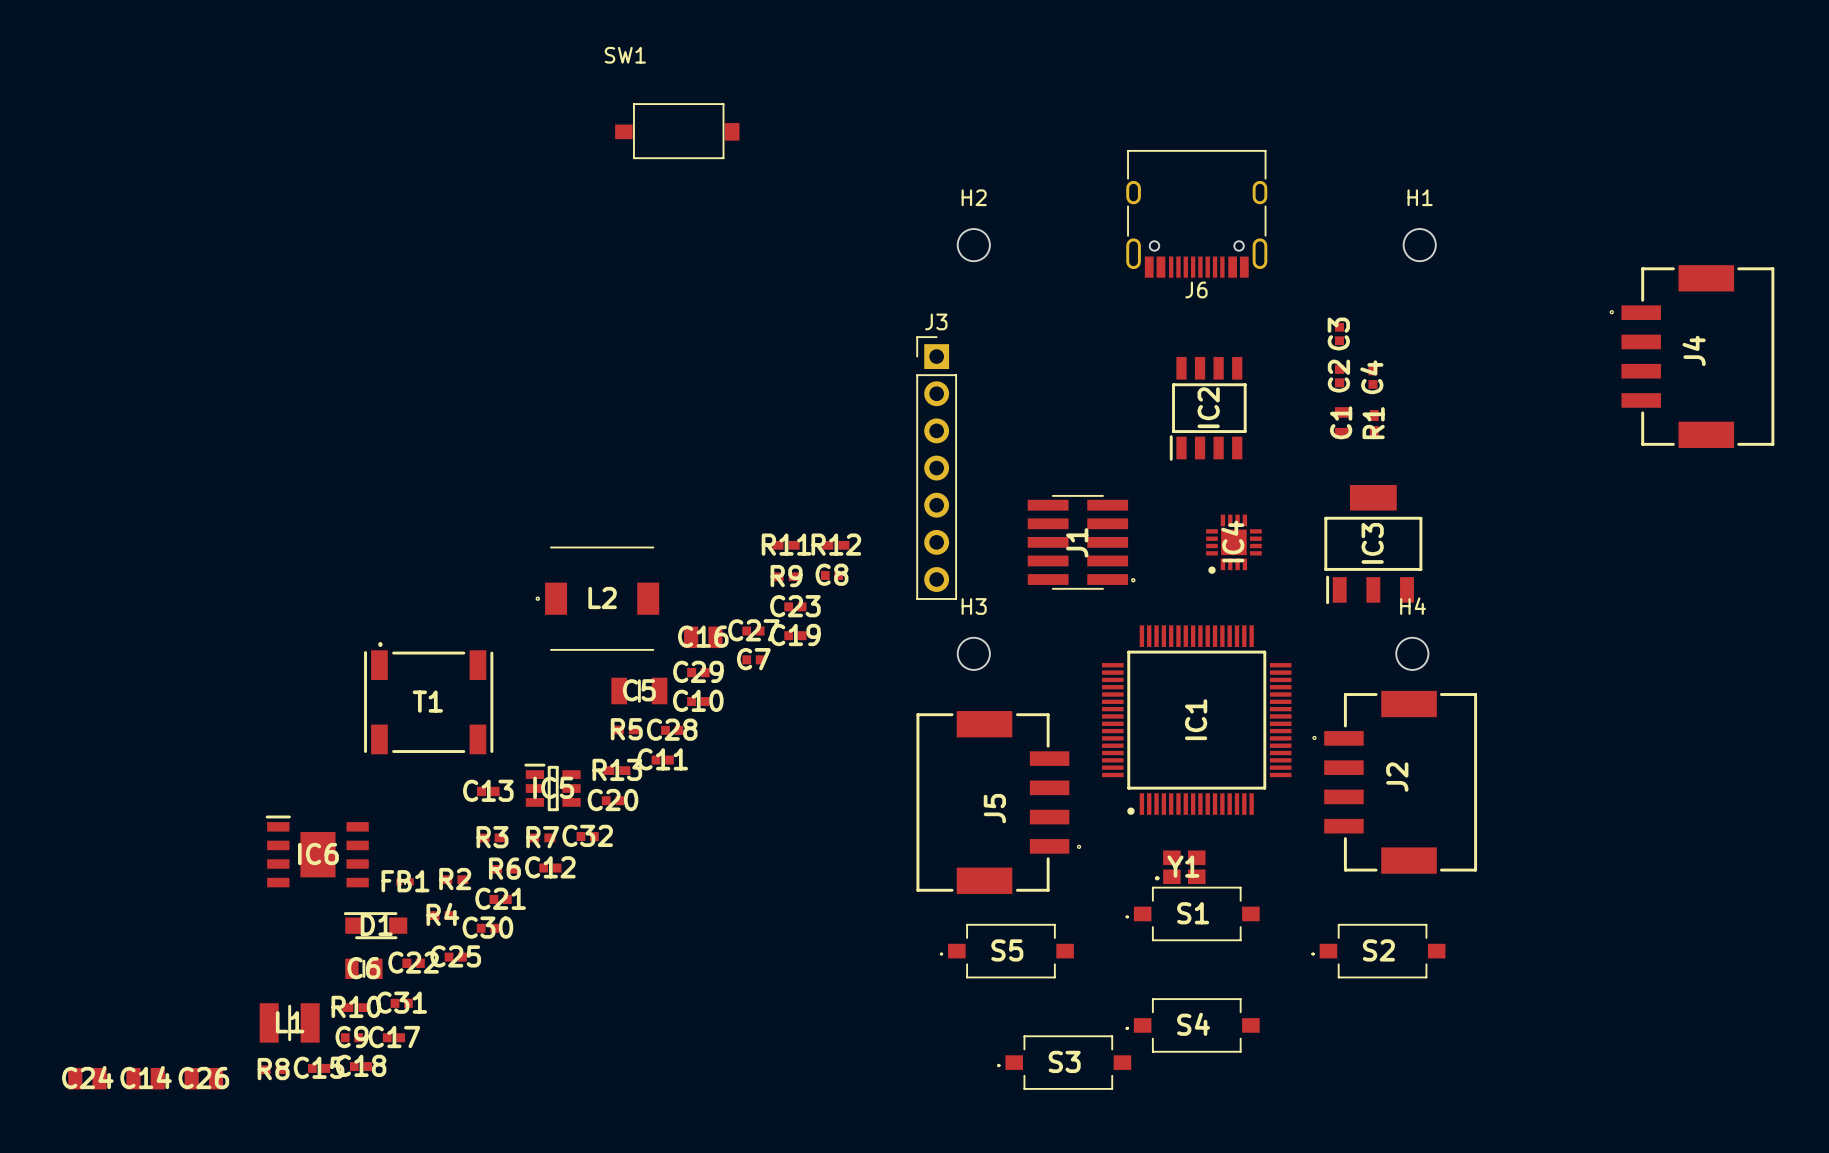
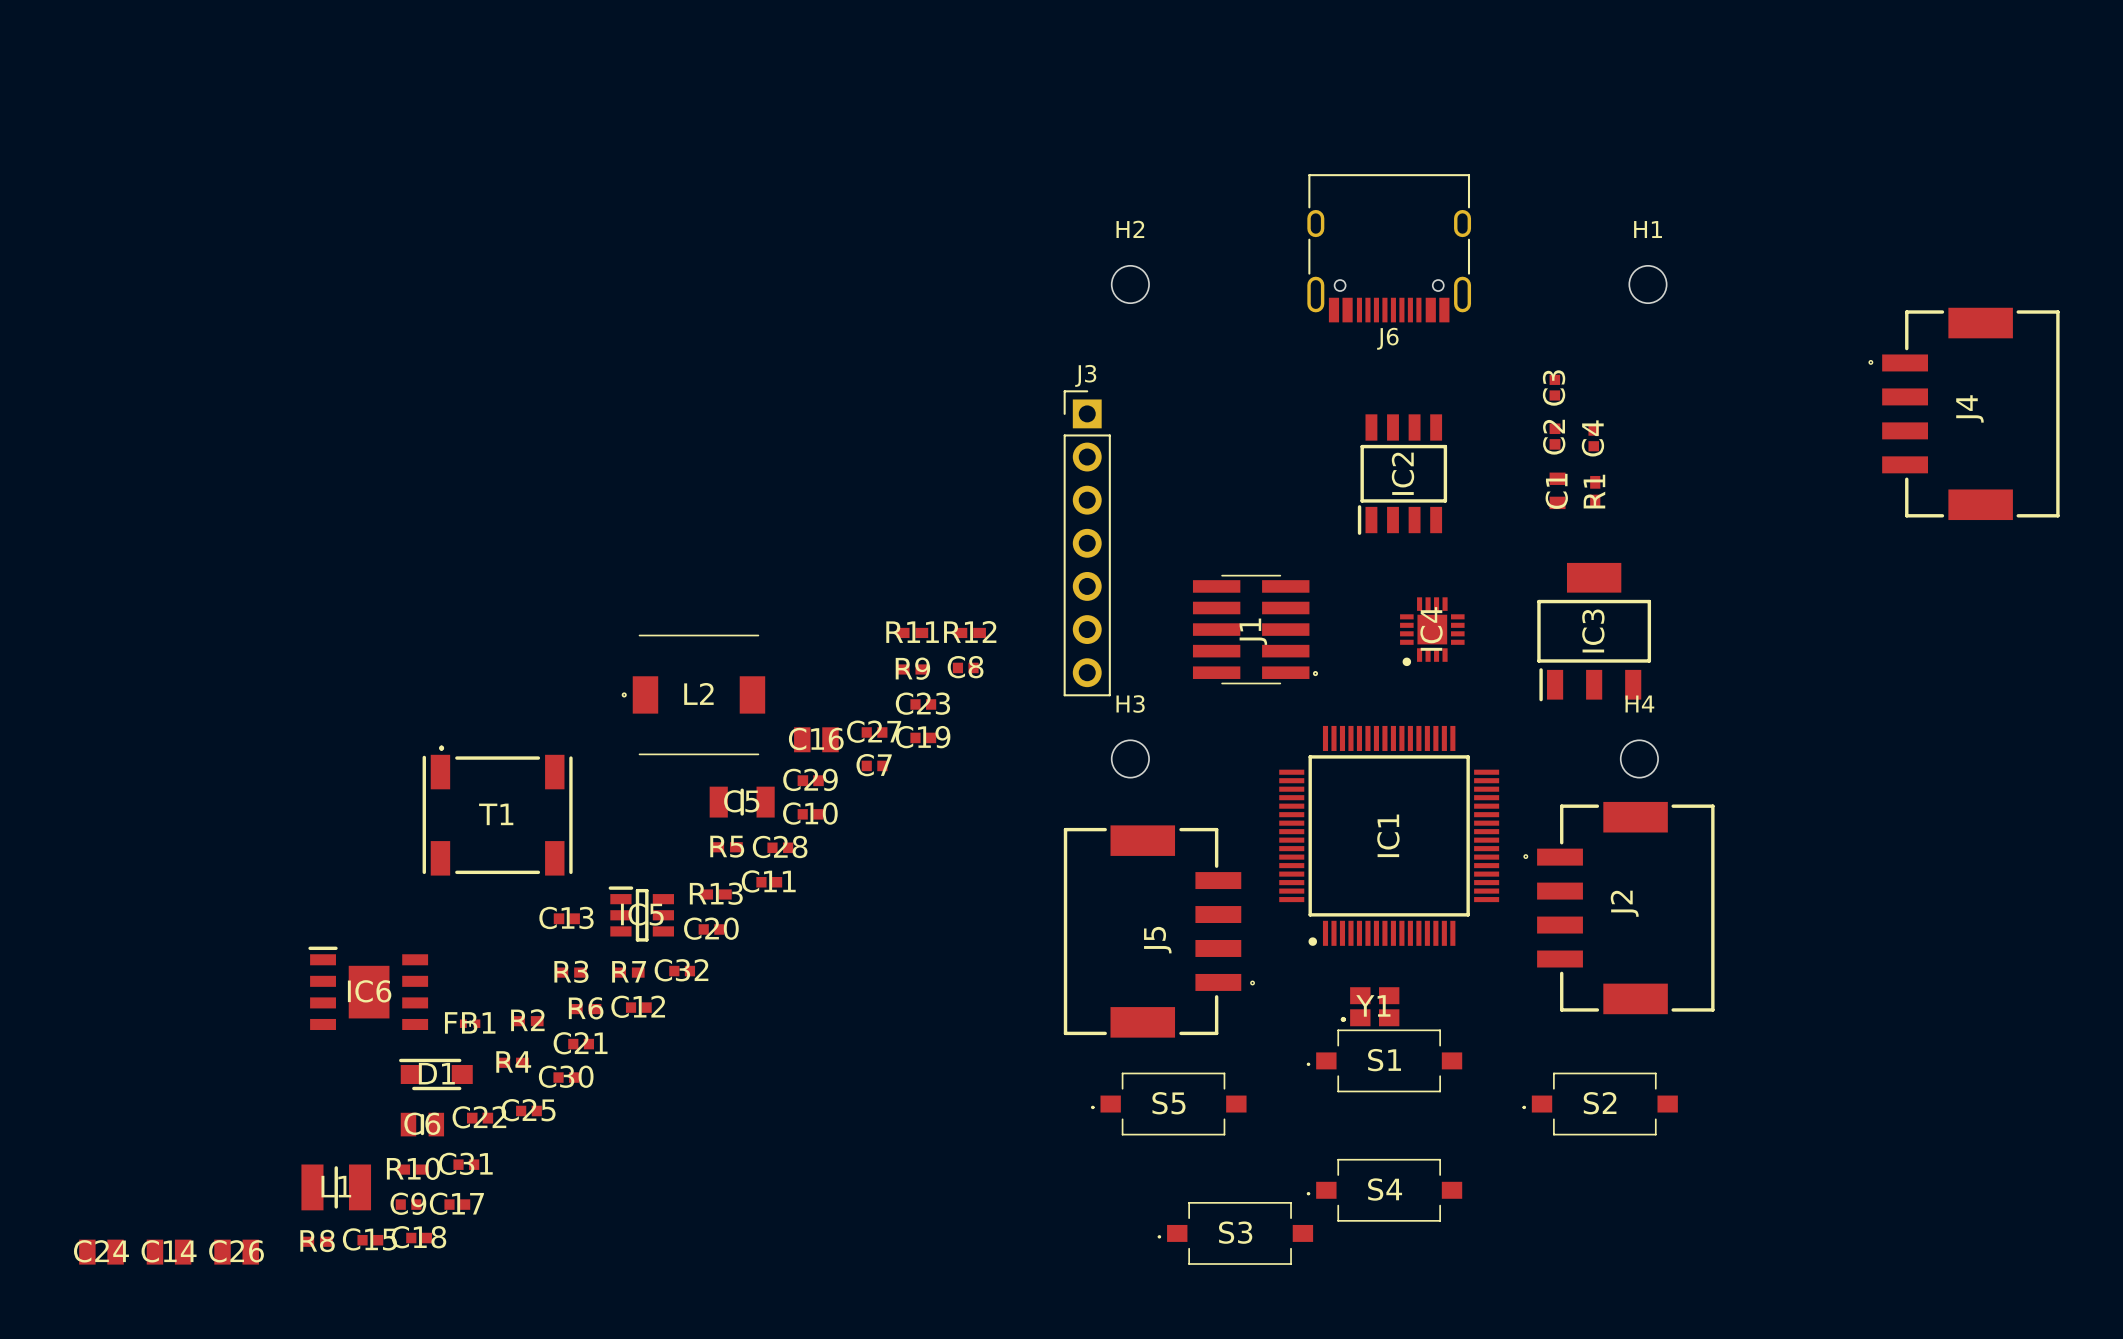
SW1: (677, 131) -> none

